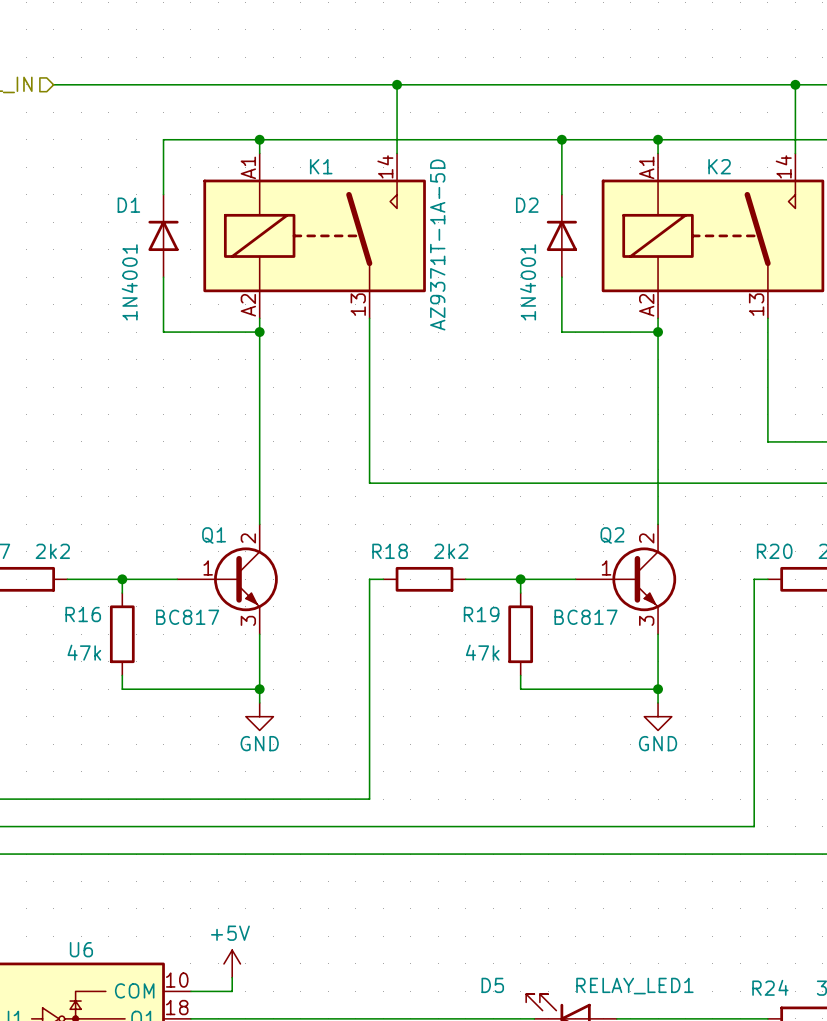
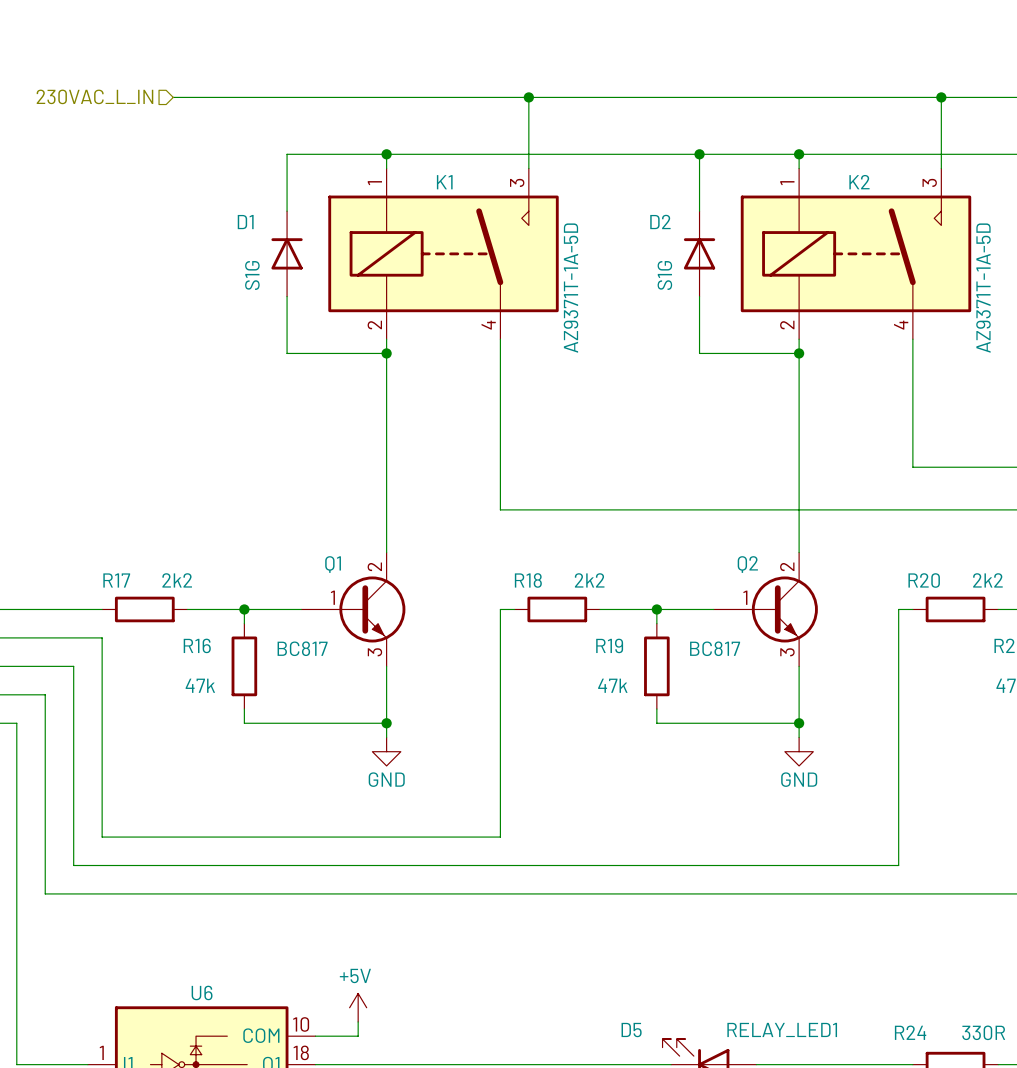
K1 pin number: 14 (385, 166) -> 3 (517, 182)
K2 pin number: 14 (783, 166) -> 3 (929, 182)
K1 pin number: A1 (248, 167) -> 1 (374, 183)
K2 pin number: A1 (646, 167) -> 1 (787, 183)
D1 value: 1N4001 (129, 282) -> S1G (252, 275)
D2 value: 1N4001 (528, 282) -> S1G (664, 275)
K1 pin number: 13 (358, 304) -> 4 (488, 325)
K2 pin number: 13 (756, 304) -> 4 (901, 325)
K1 pin number: A2 (248, 305) -> 2 (374, 325)
K2 pin number: A2 (646, 305) -> 2 (787, 325)

